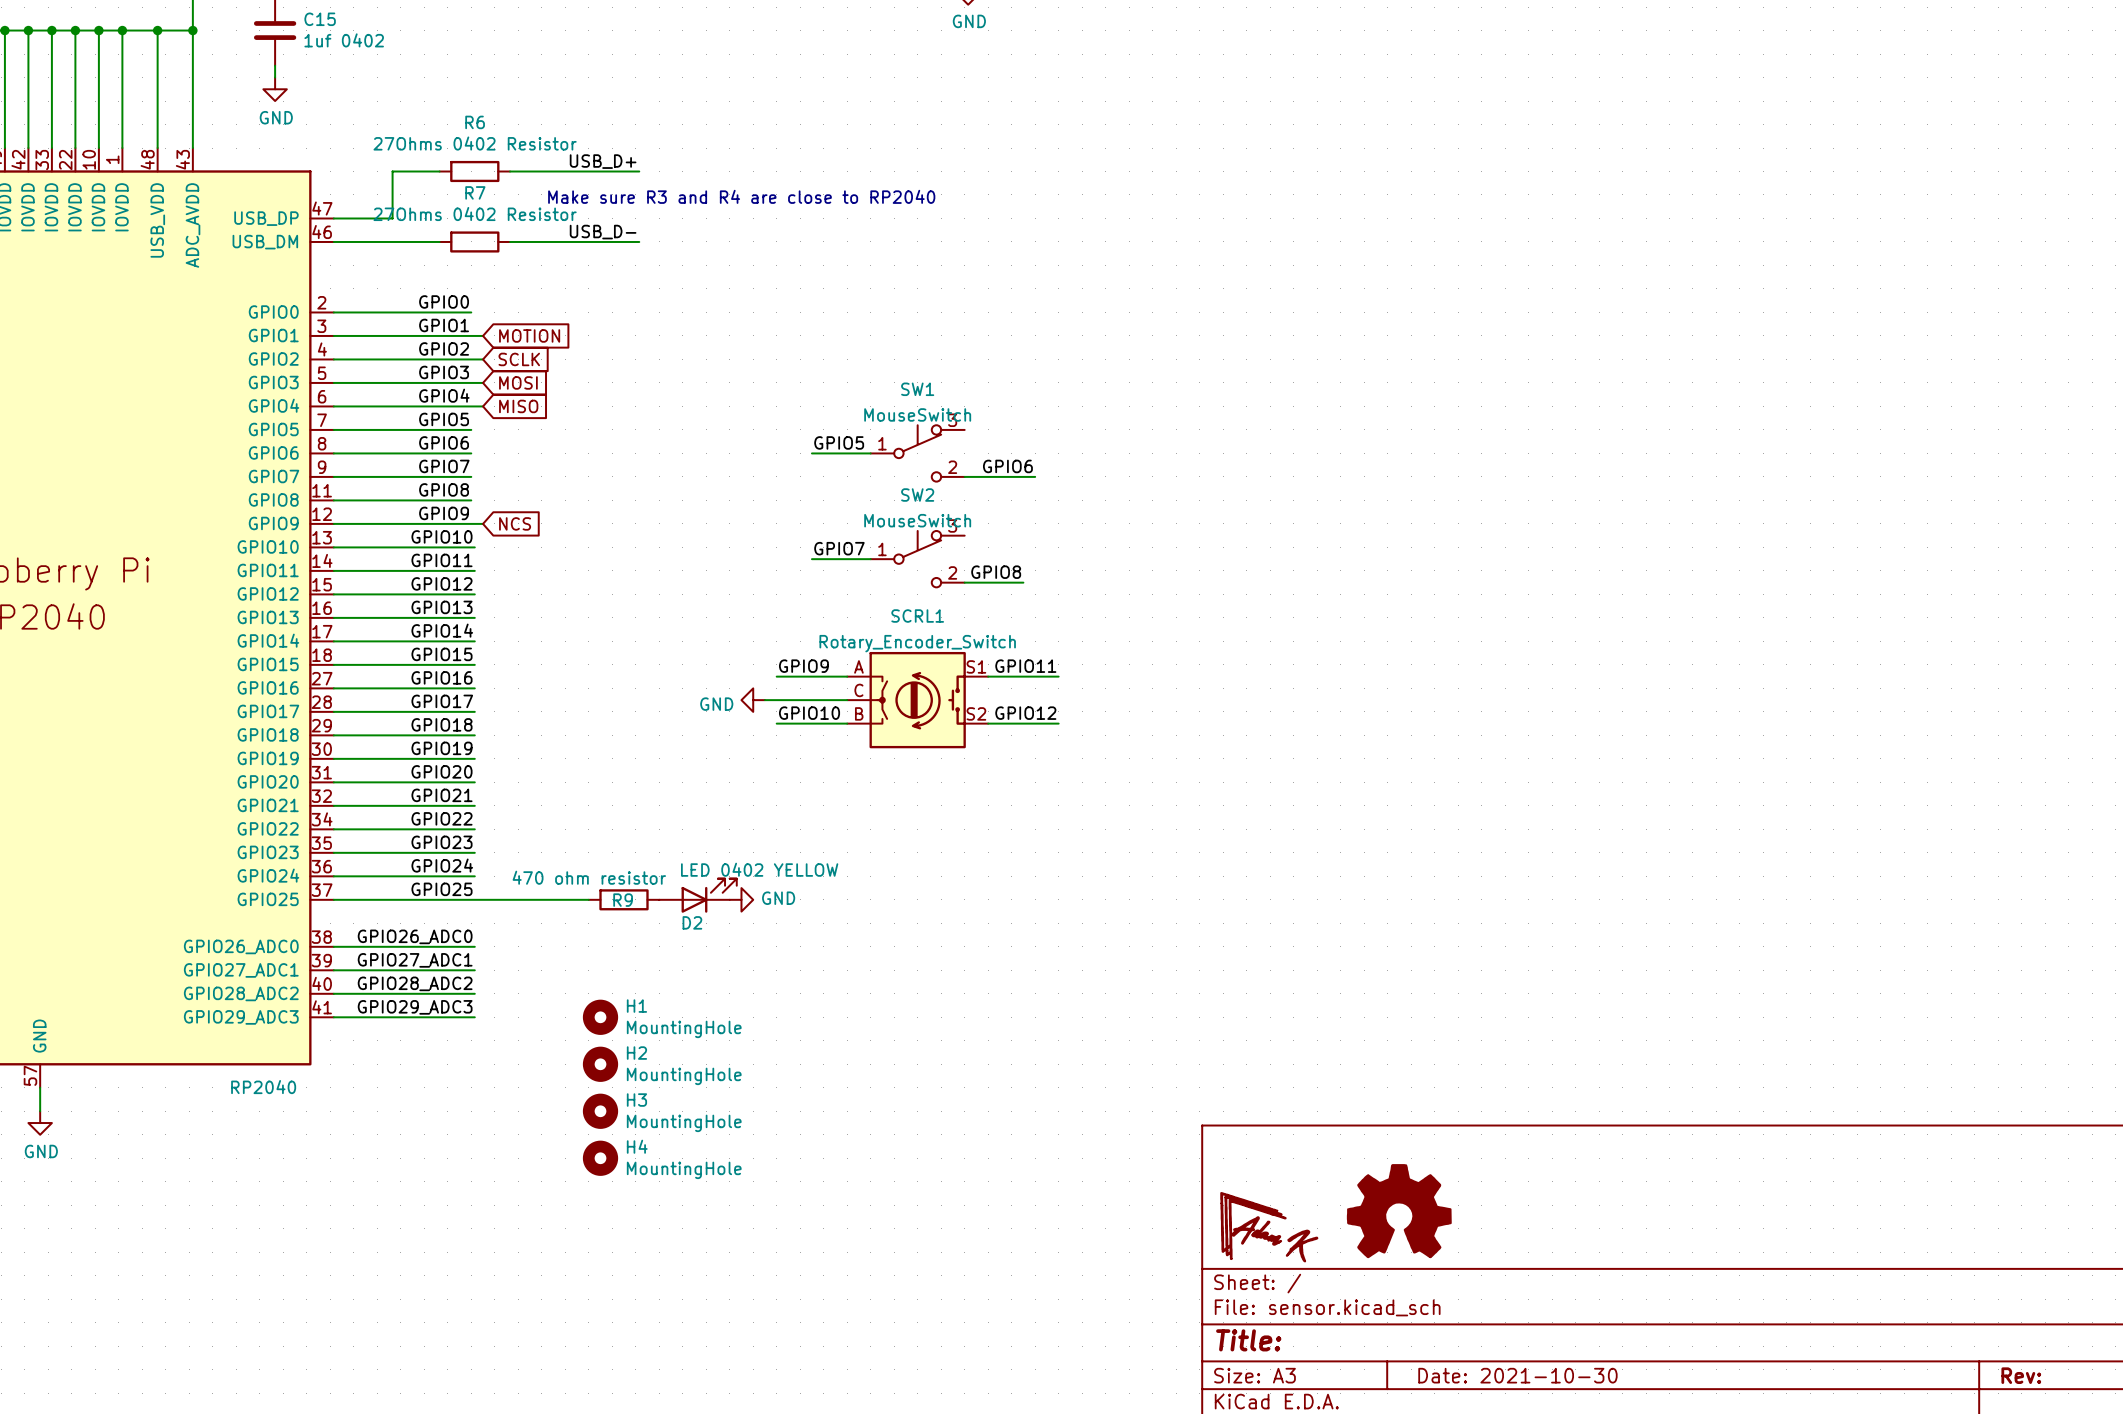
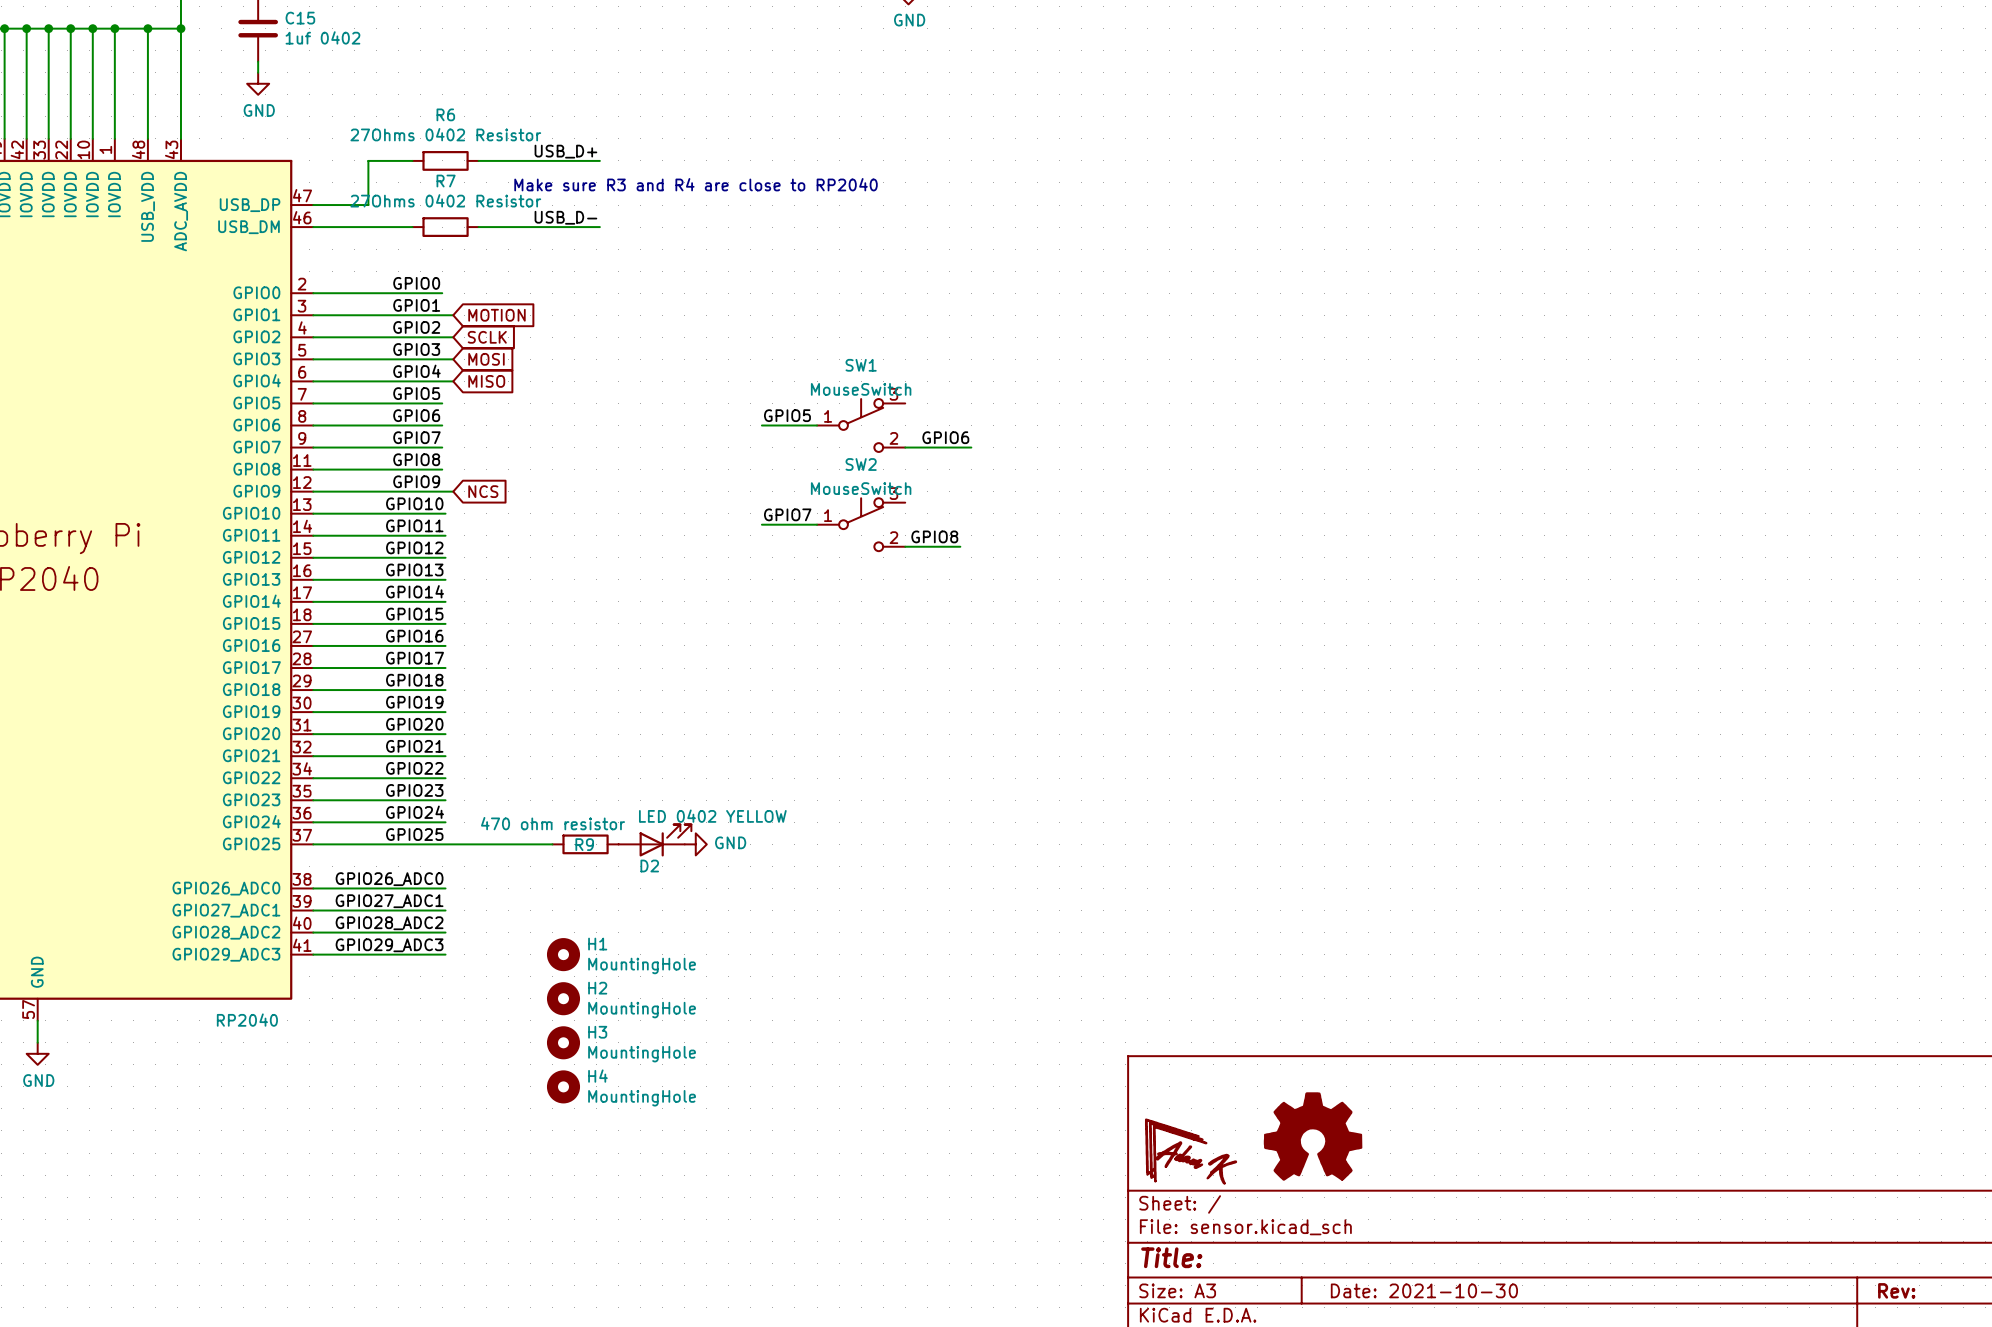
label: GPIO9 (803, 666) -> none
label: GPIO11 (1025, 666) -> none
wire: (776, 676) (847, 676) -> none
wire: (988, 676) (1058, 676) -> none
power symbol: GND (753, 700) -> none
wire: (764, 700) (847, 700) -> none
SCRL1: Rotary_Encoder_Switch (917, 700) -> none
label: GPIO10 (809, 713) -> none
label: GPIO12 (1025, 713) -> none
wire: (776, 723) (847, 723) -> none
wire: (988, 723) (1058, 723) -> none

